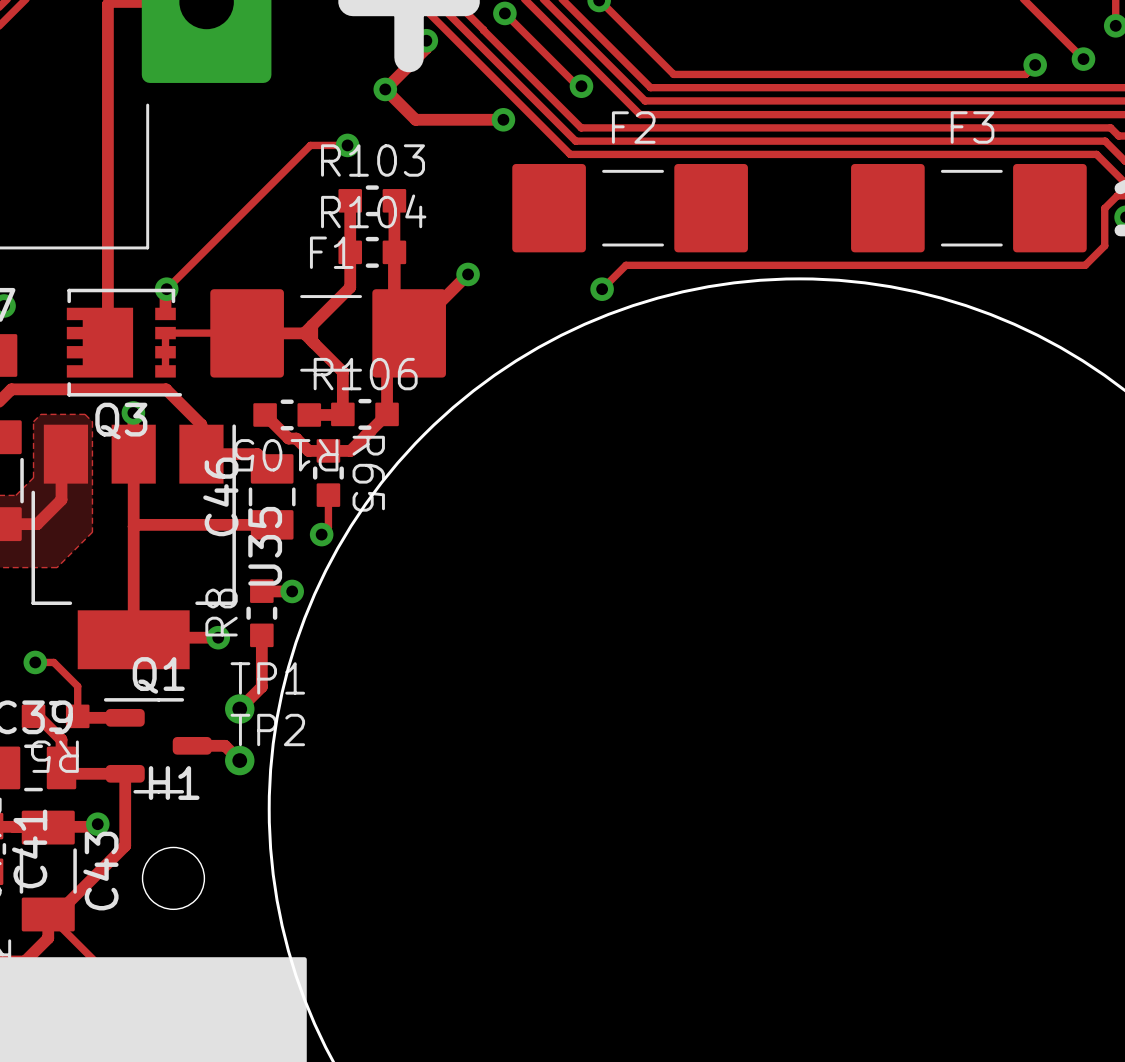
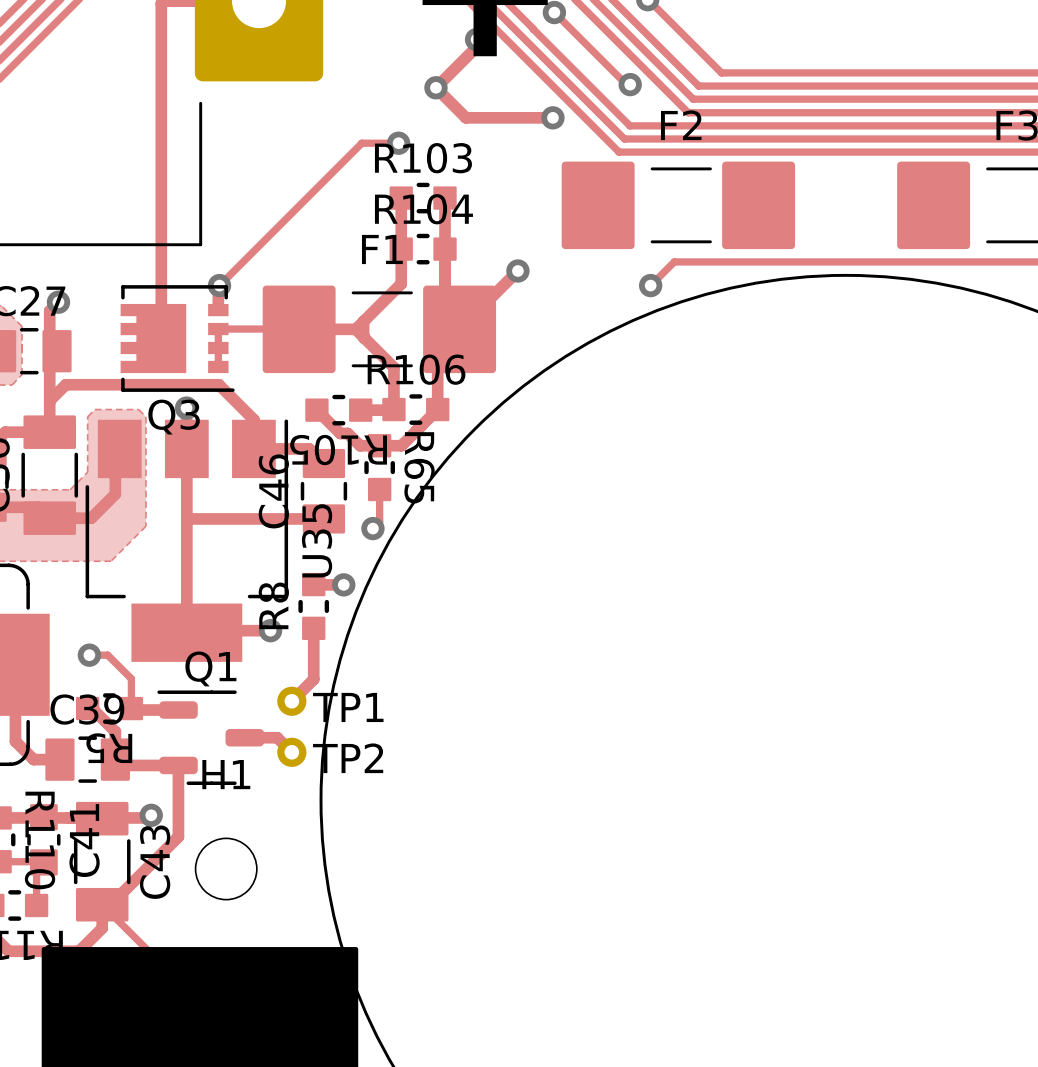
TP1 name position: TP1 (267, 678) -> TP1 (348, 707)
TP2 name position: TP2 (267, 729) -> TP2 (348, 758)

